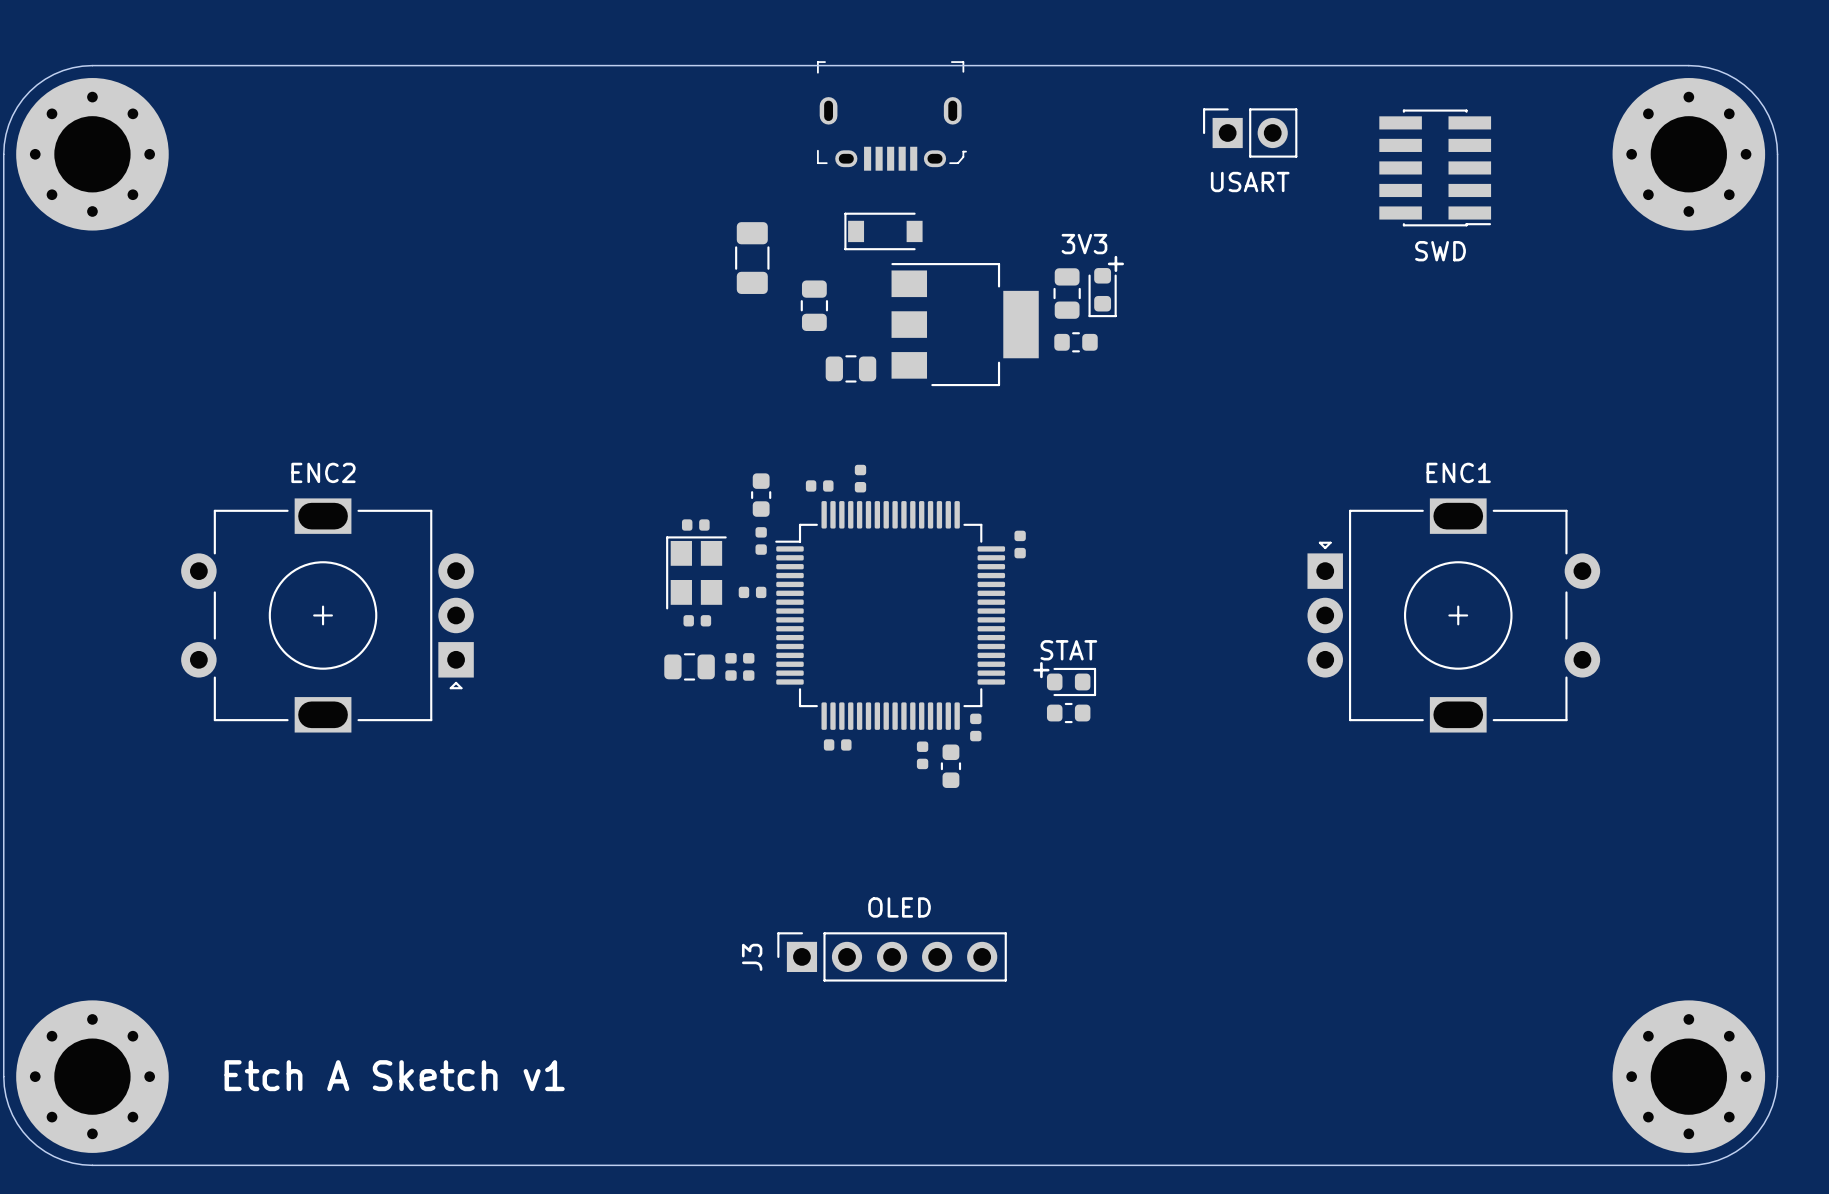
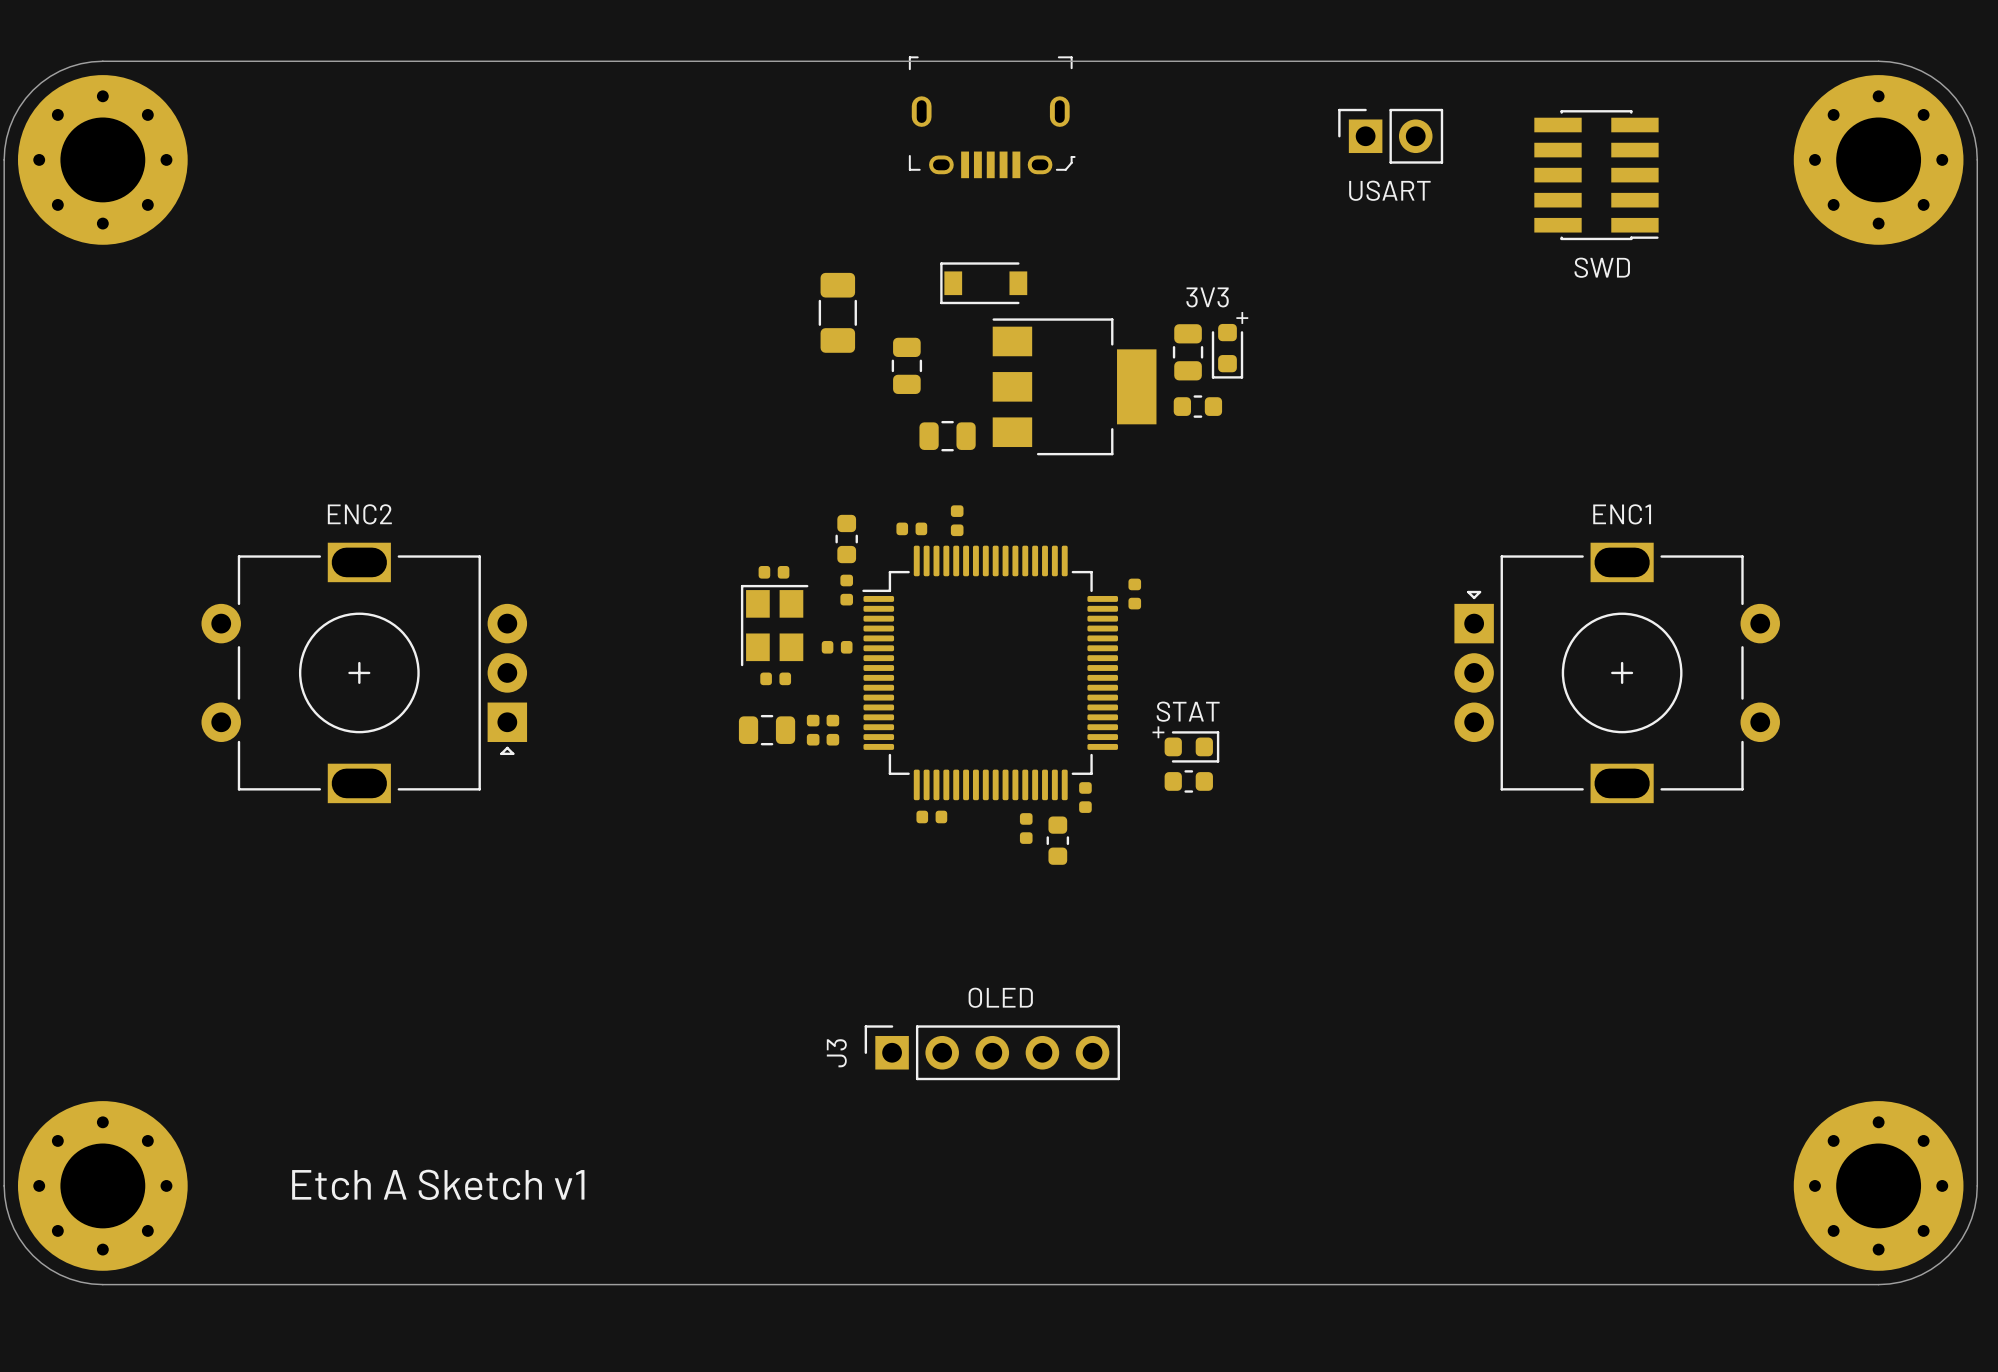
part position: (883, 231) -> (983, 283)
text position: 3V3 (1084, 244) -> 3V3 (1207, 297)
part position: (752, 258) -> (837, 312)
text position: + (1115, 263) -> + (1242, 317)
part position: (1102, 292) -> (1227, 351)
part position: (1067, 293) -> (1188, 352)
part: (814, 305) -> none
part position: (965, 324) -> (1074, 386)
part: none -> (906, 365)
part position: (1076, 342) -> (1197, 406)
part: (850, 368) -> none
part: none -> (947, 436)

